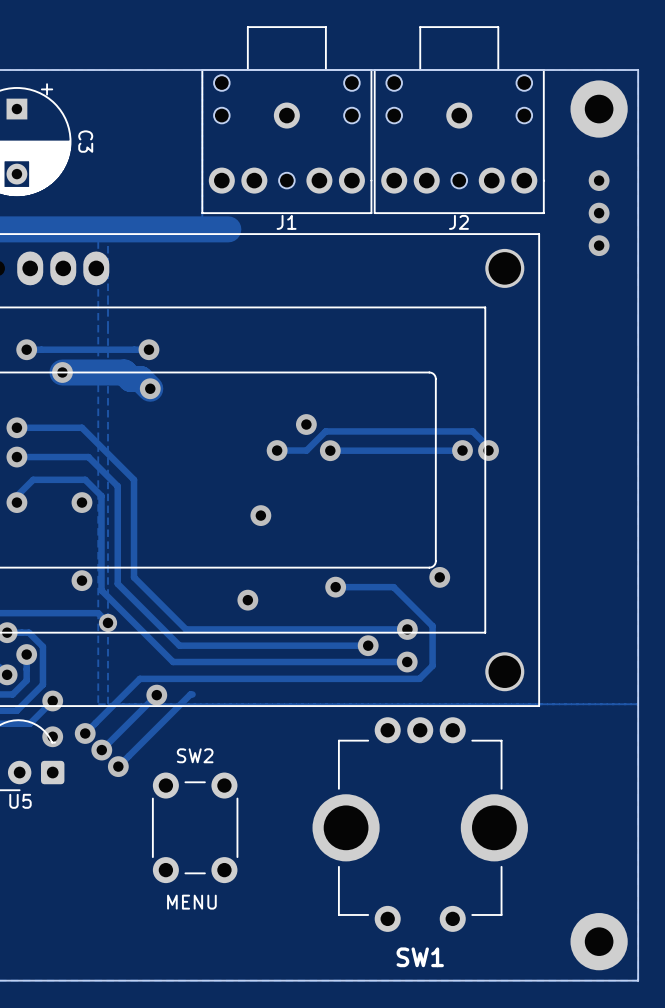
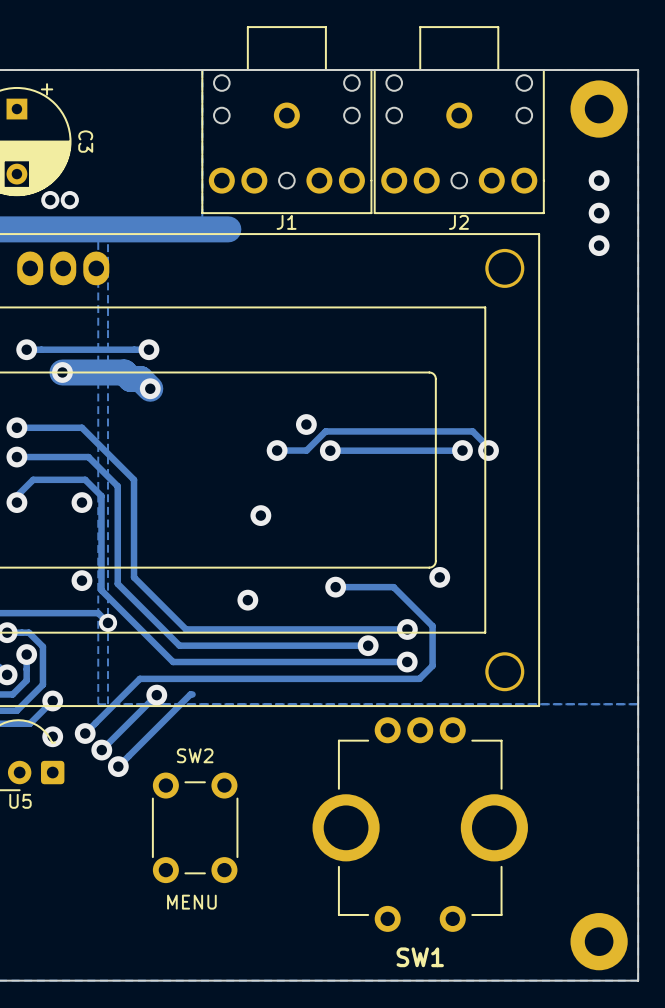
via: none -> (50, 200)
via: none -> (69, 200)

